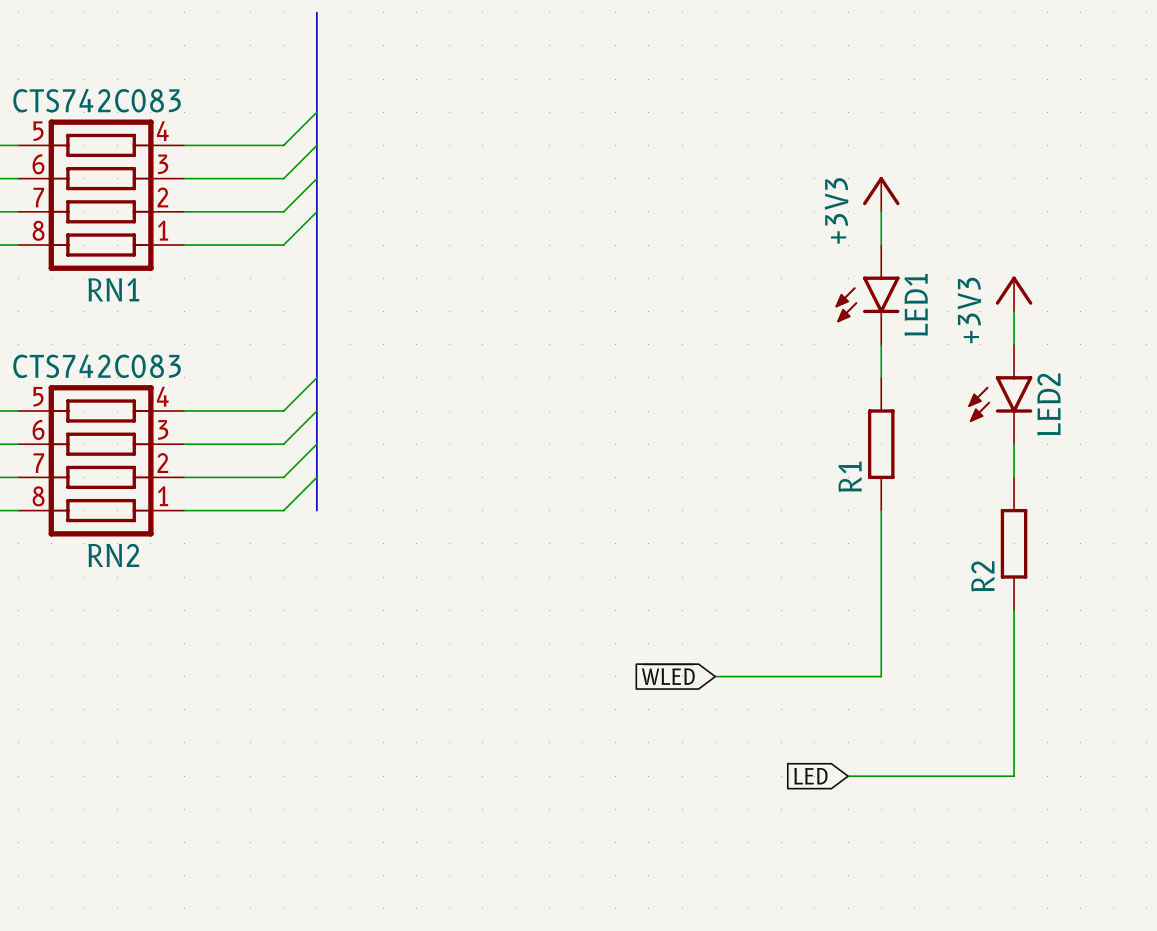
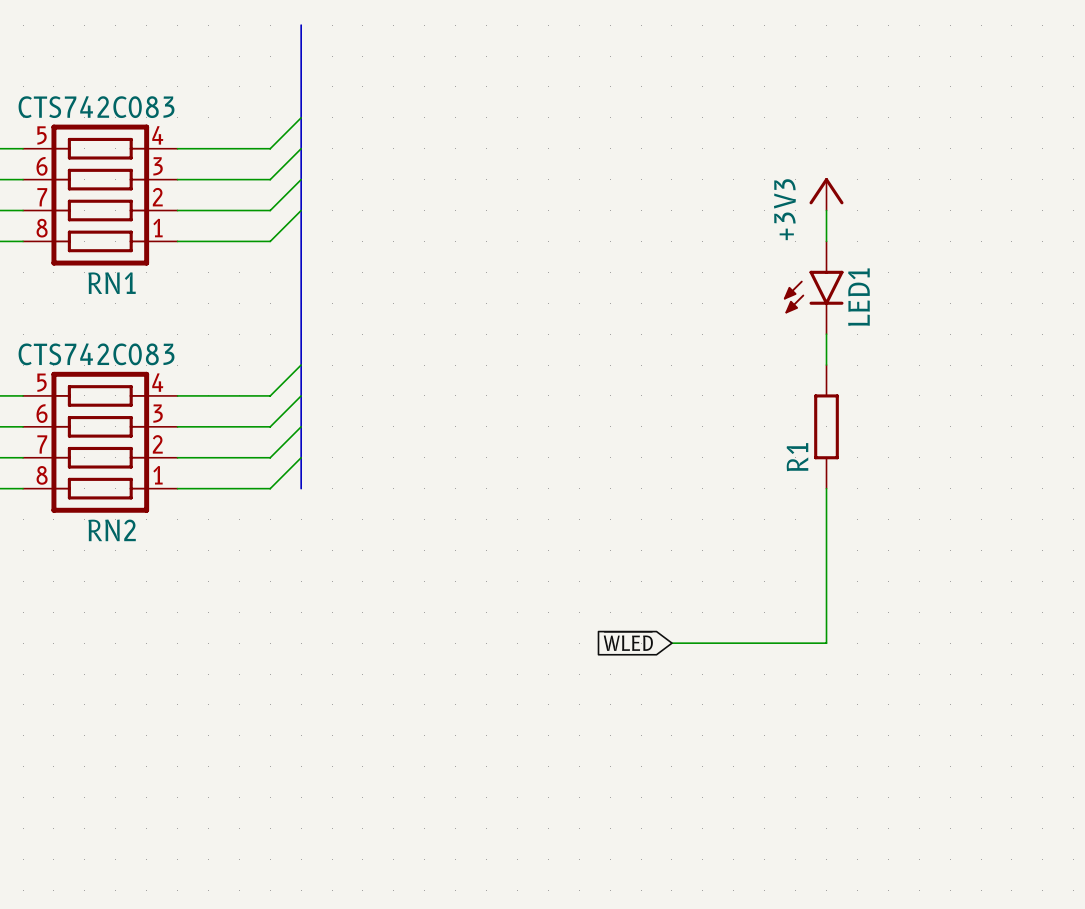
power symbol: +3V3 (1014, 293) -> none
wire: (1014, 311) (1014, 344) -> none
LED2: (1000, 394) -> none
wire: (1014, 444) (1014, 477) -> none
R2: (1014, 543) -> none
wire: (1014, 610) (1014, 776) (848, 776) -> none
global label: LED (810, 776) -> none

